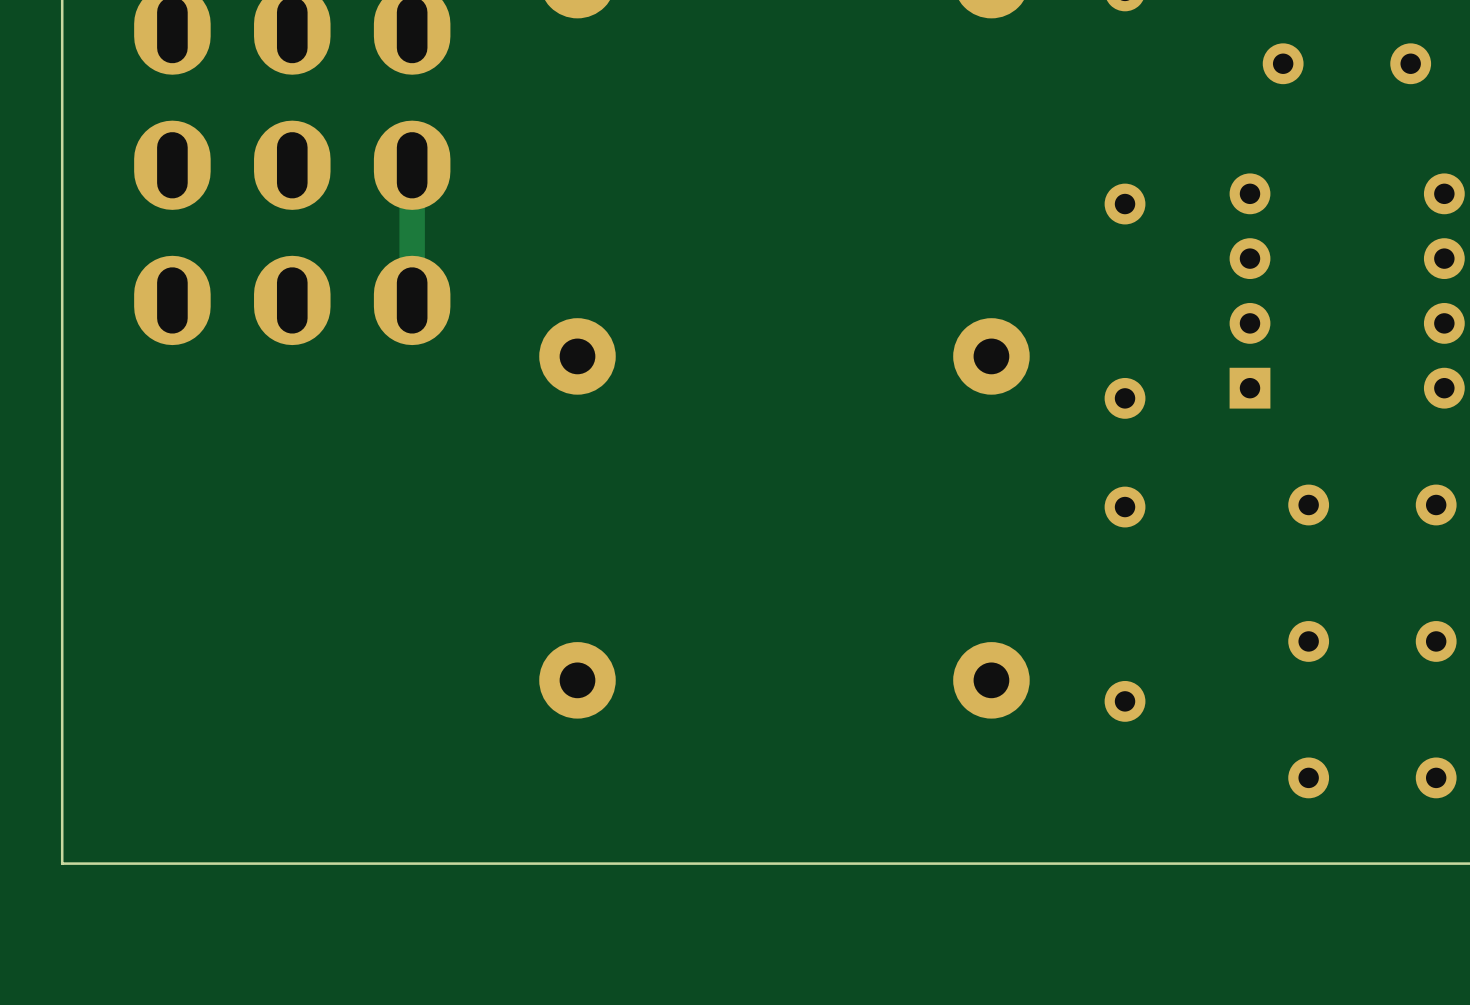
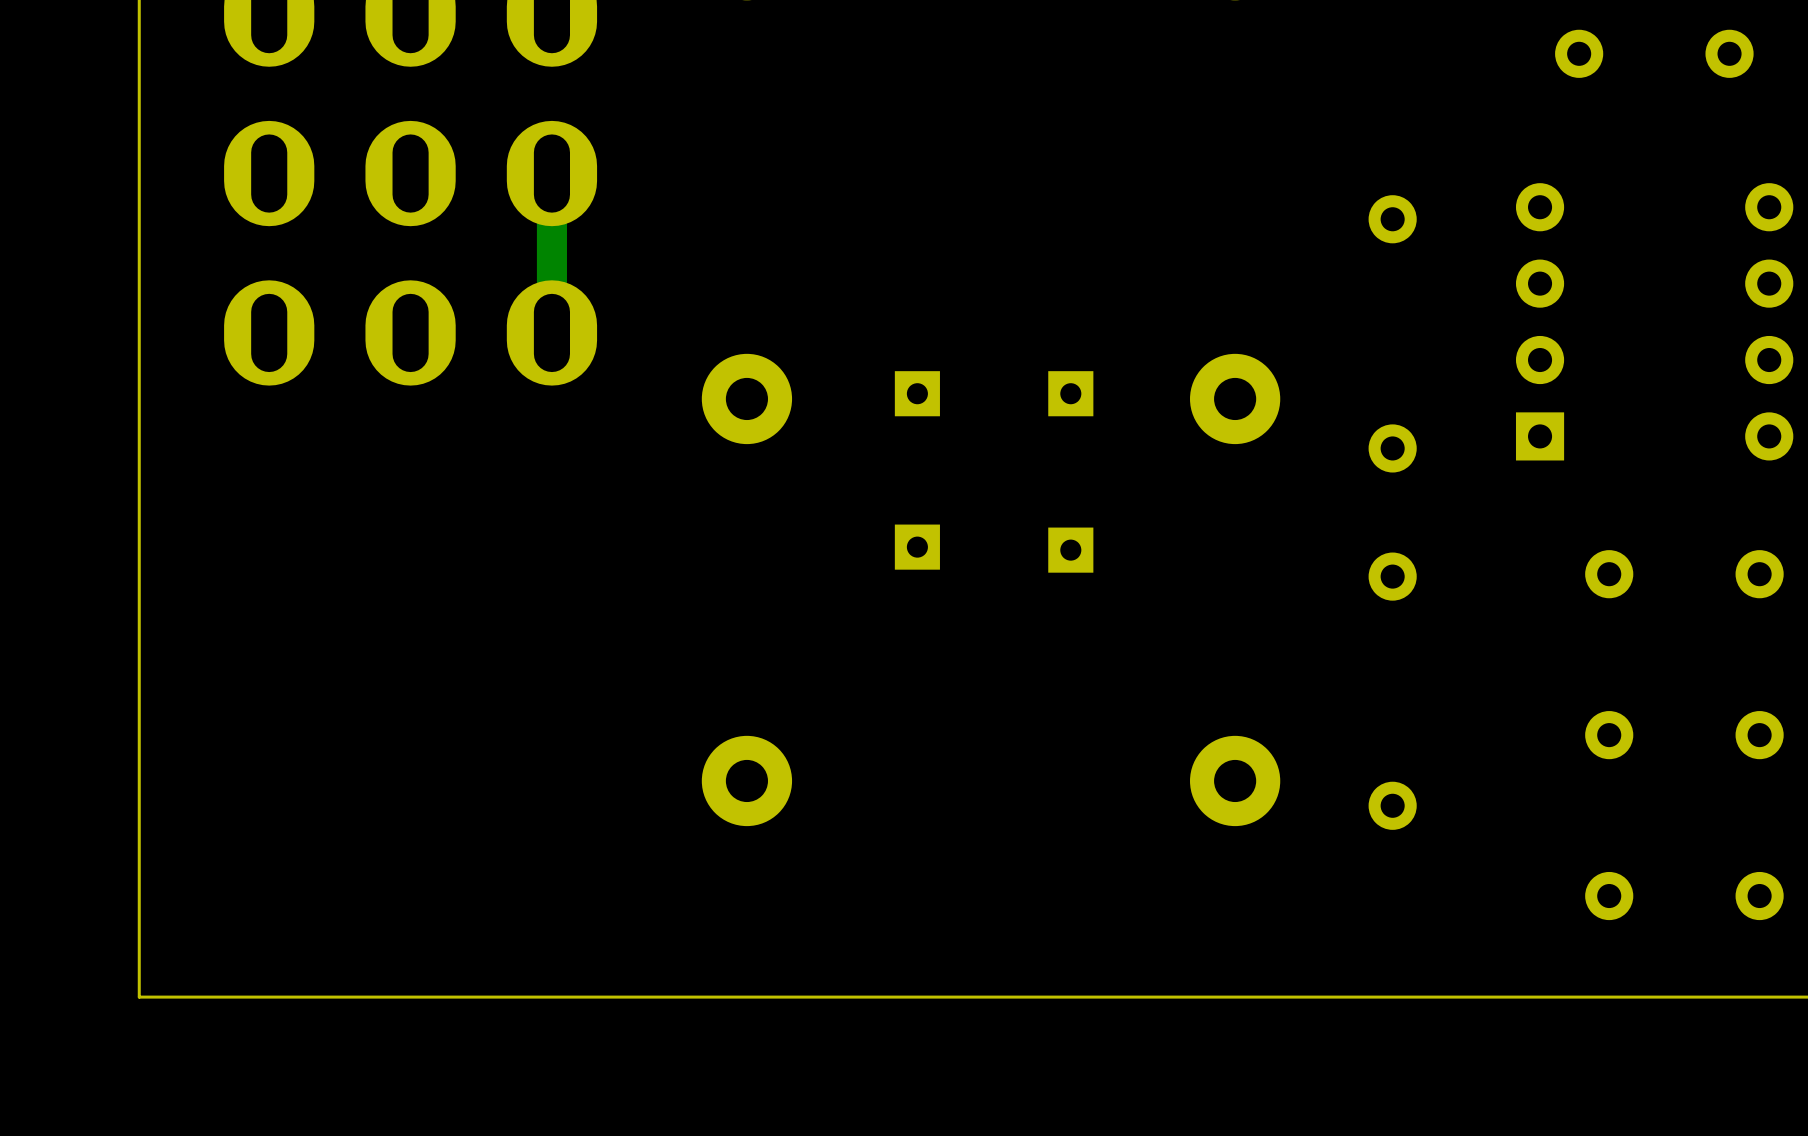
part: none -> (917, 393)
part: none -> (1070, 393)
part: none -> (917, 547)
part: none -> (1070, 550)

